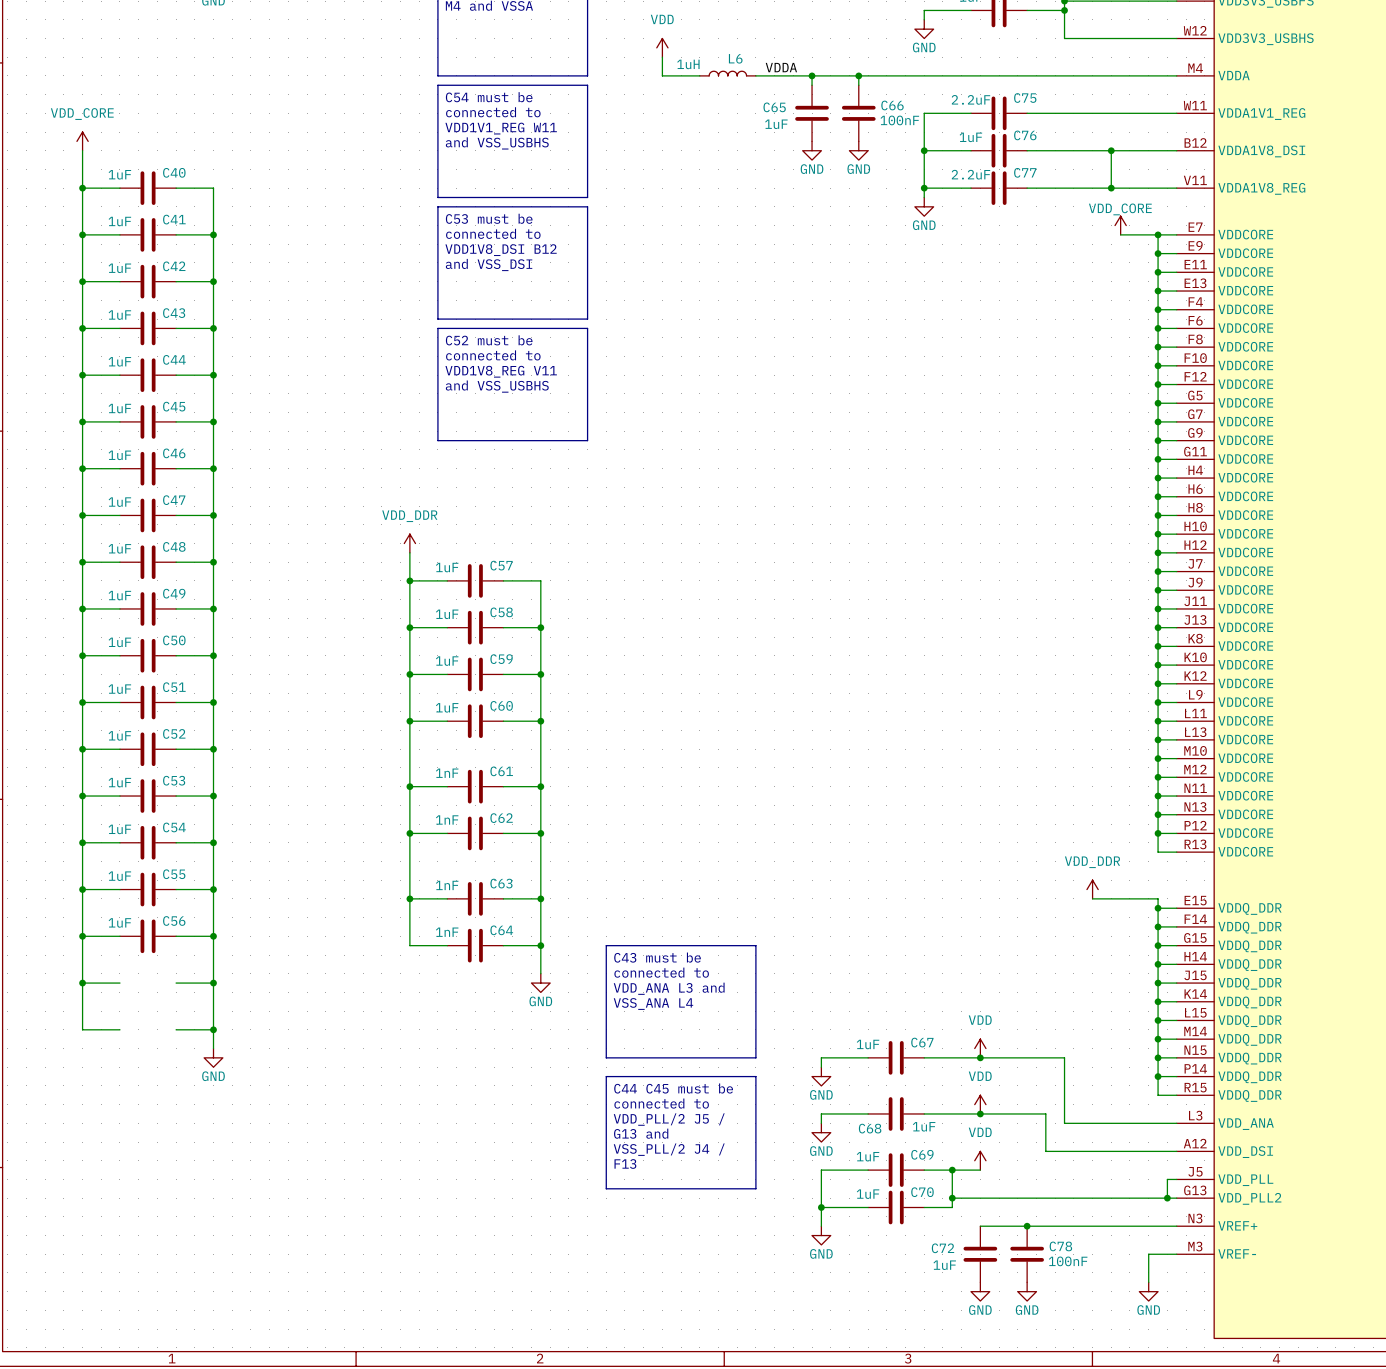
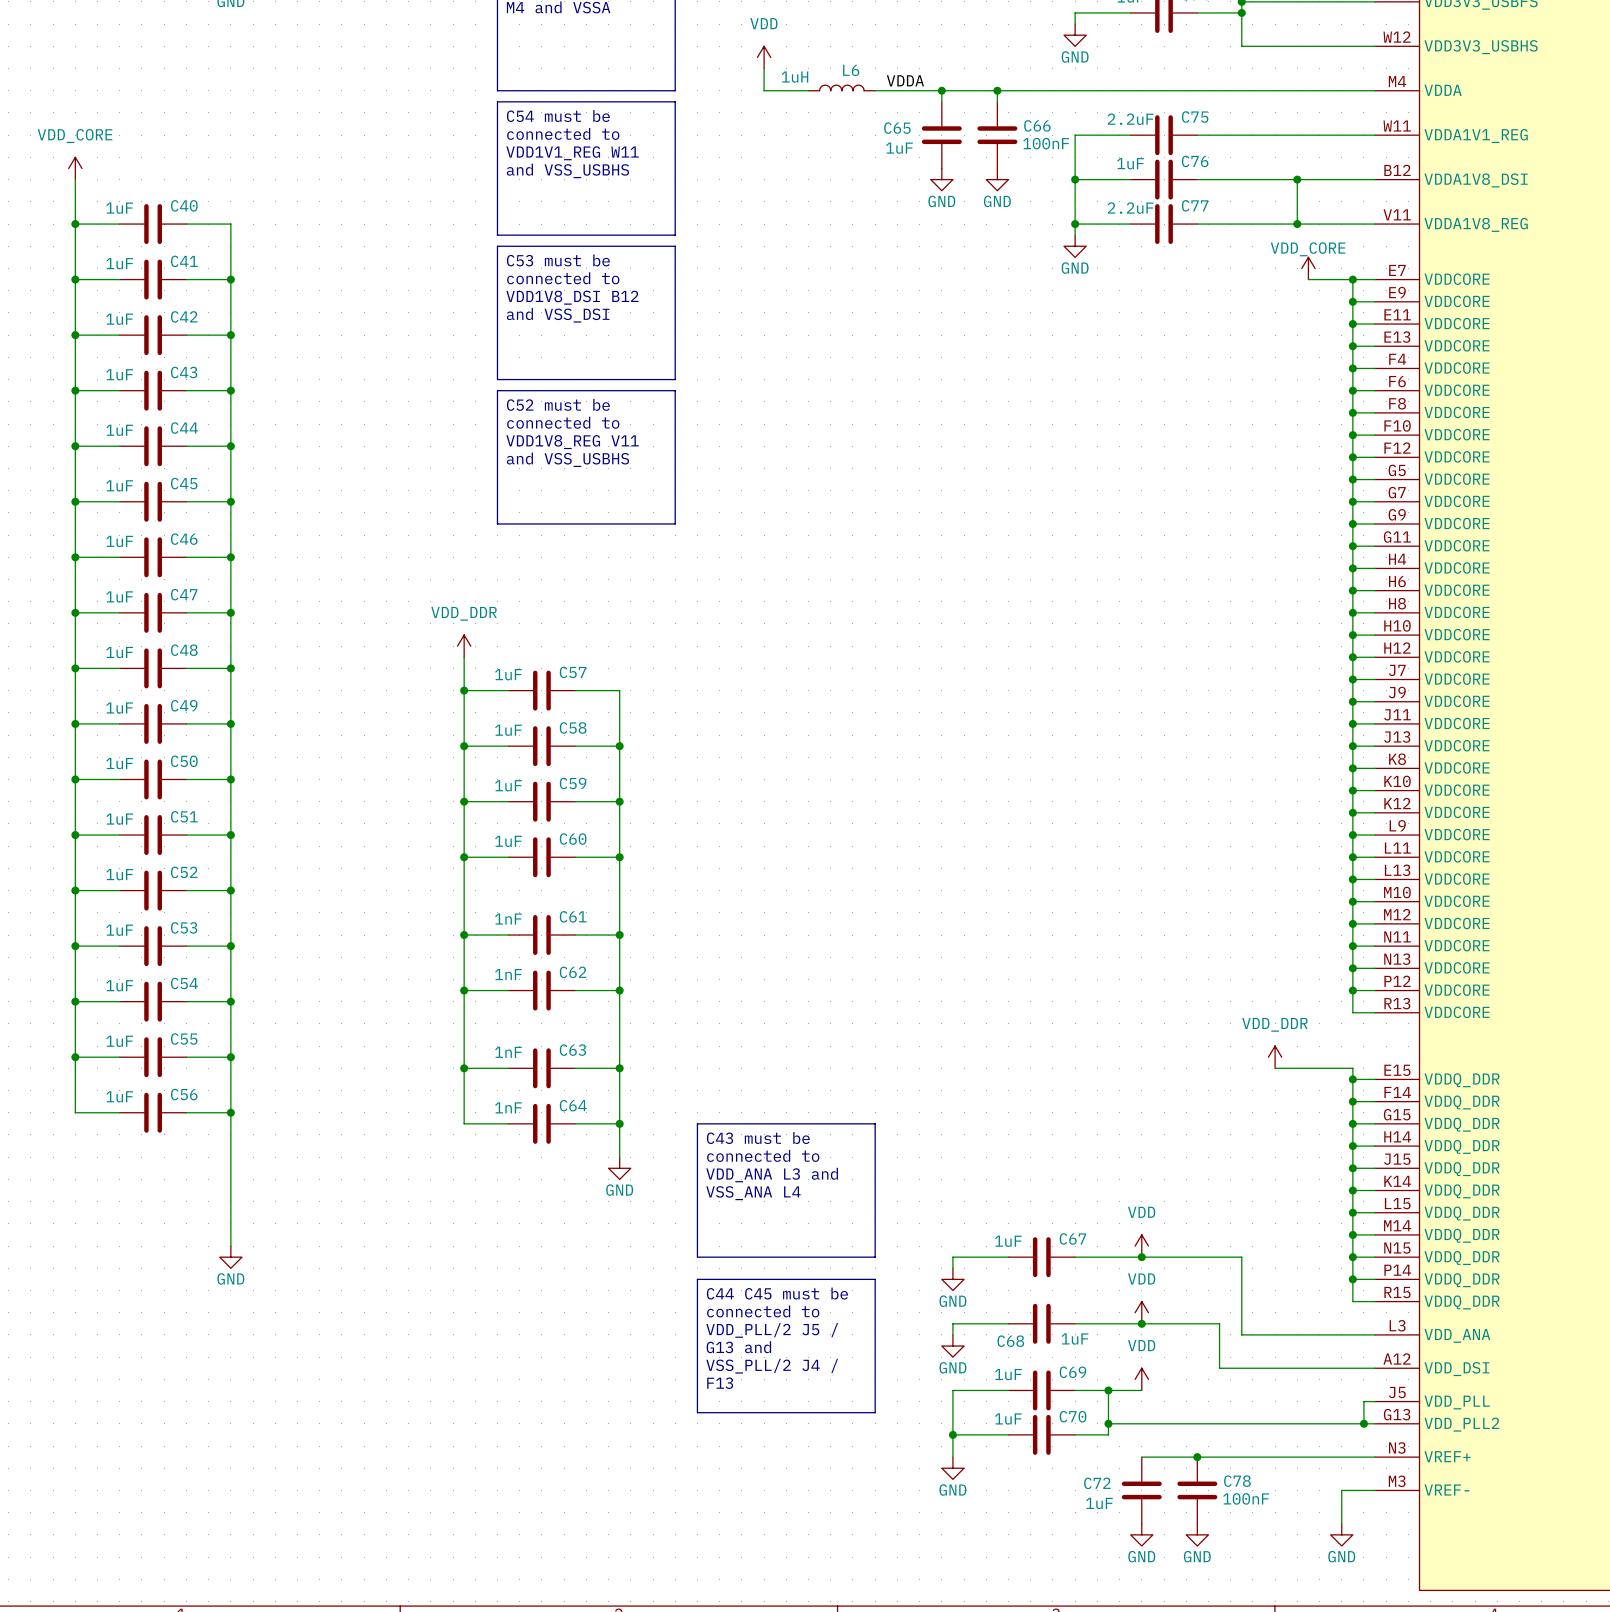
wire: (82, 936) (82, 1029) (119, 1029) -> none
junction: (82, 936) -> none
wire: (82, 983) (119, 983) -> none
junction: (82, 983) -> none
wire: (176, 983) (213, 983) -> none
junction: (213, 983) -> none
wire: (176, 1029) (213, 1029) -> none
junction: (213, 1029) -> none

